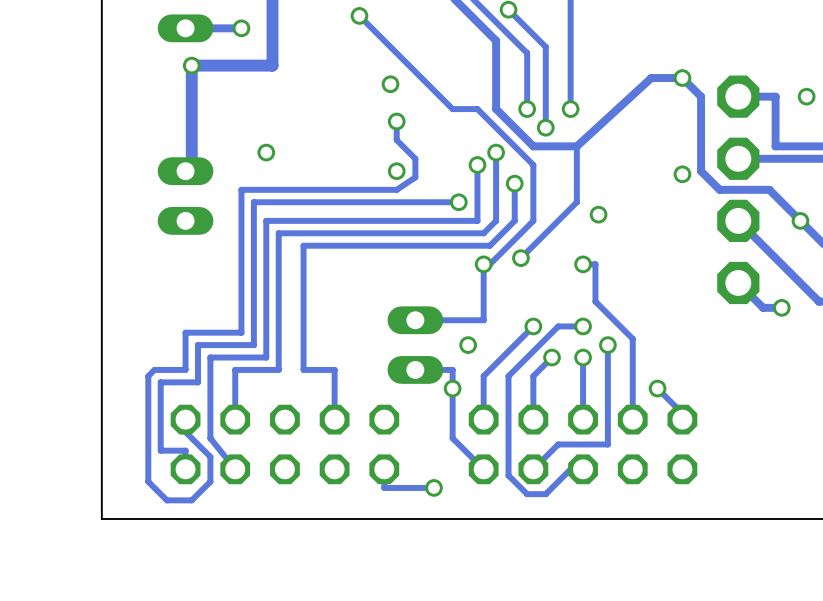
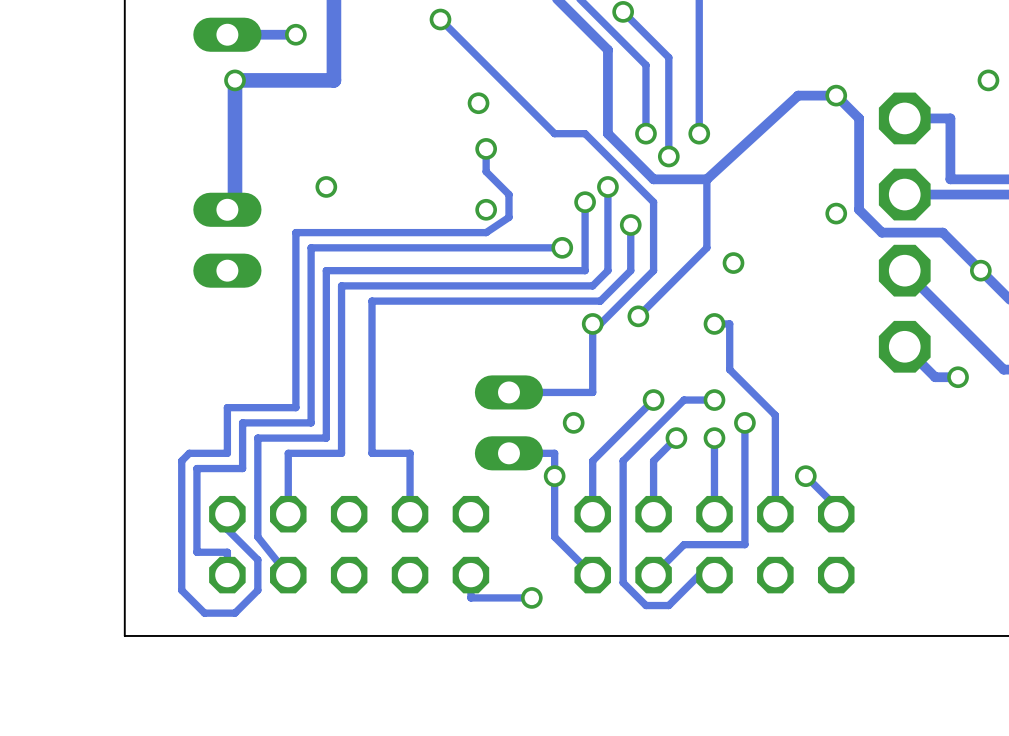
via position: (806, 96) -> (988, 80)

